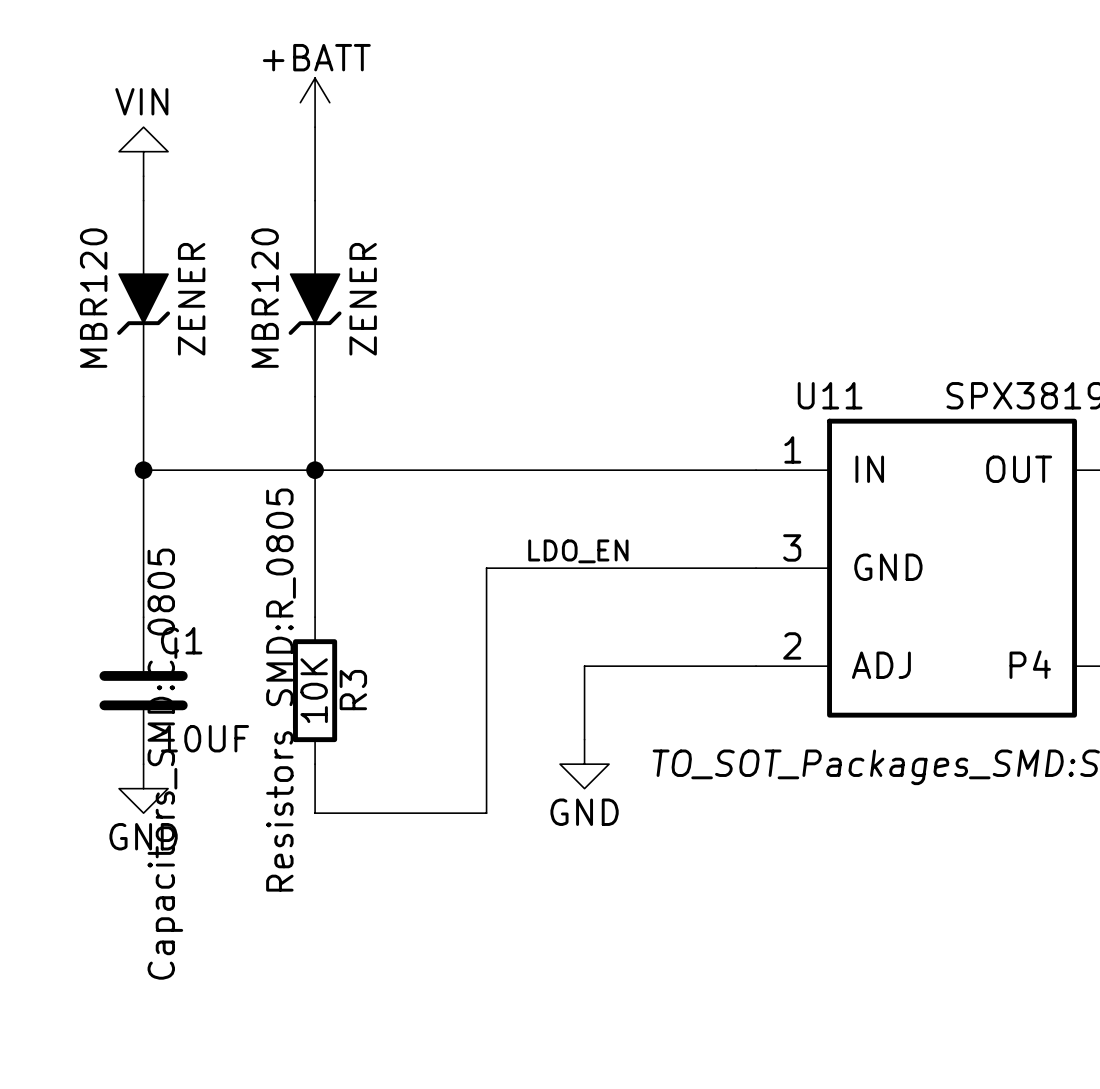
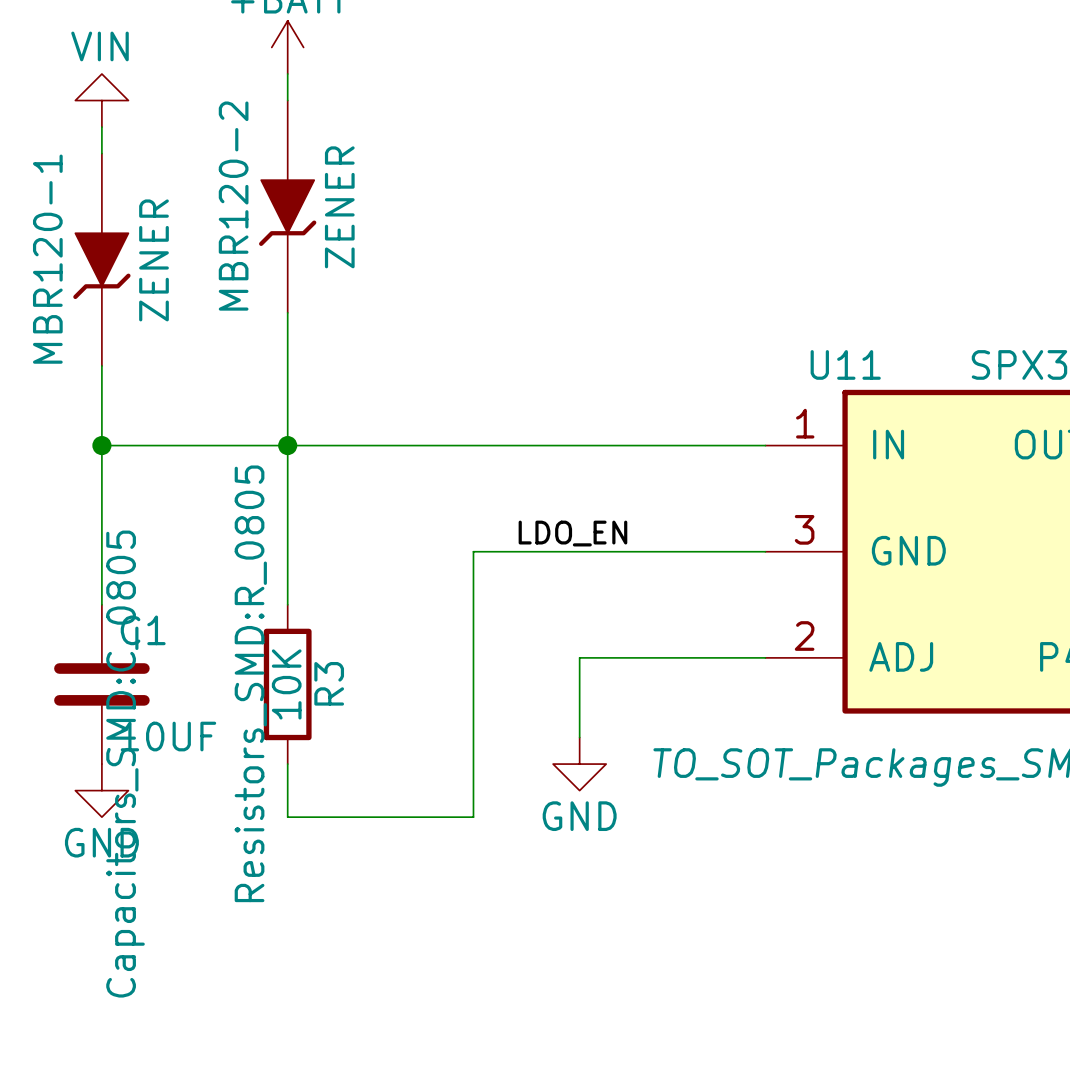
MBR120-2: none -> ZENER (287, 206)
MBR120 name: MBR120 (93, 298) -> MBR120-1 (47, 259)
MBR120: ZENER (315, 298) -> none

